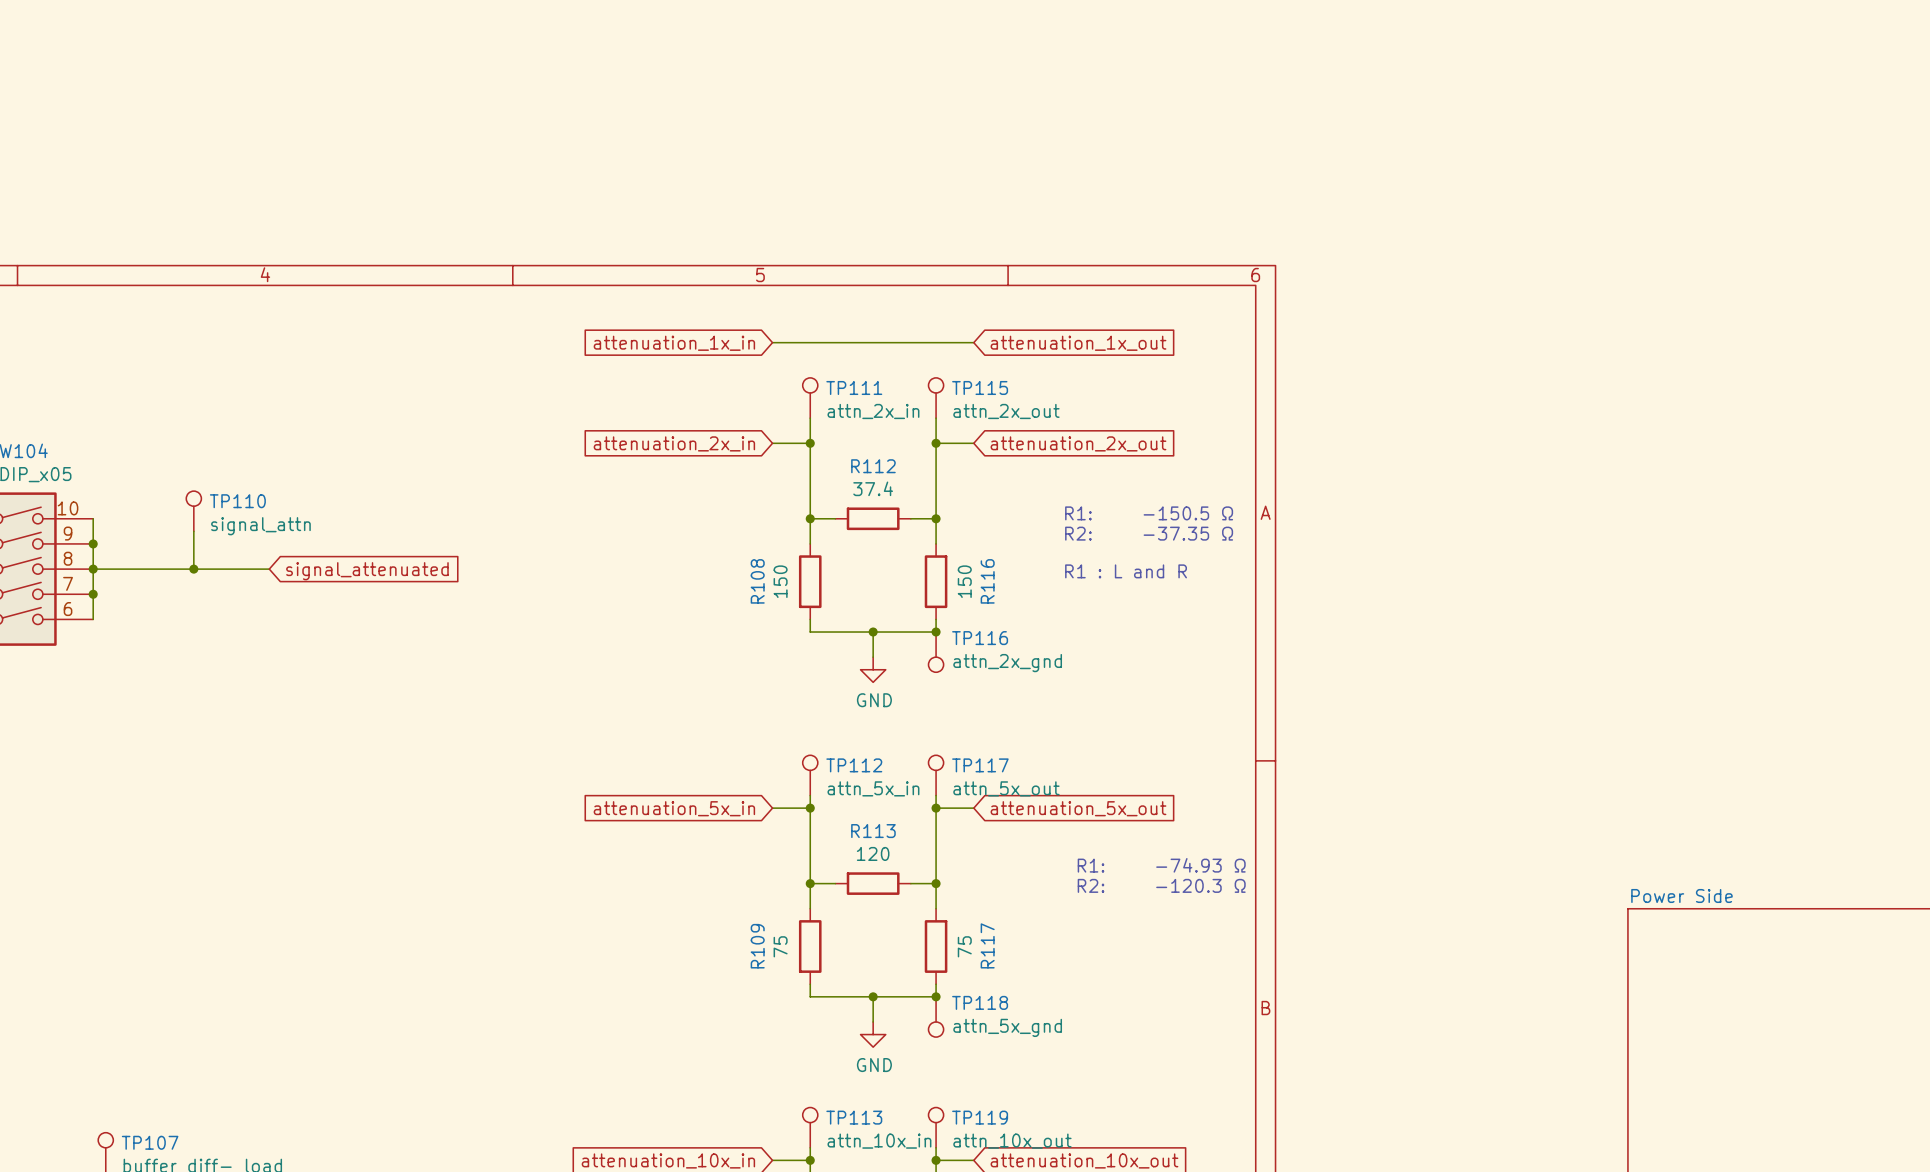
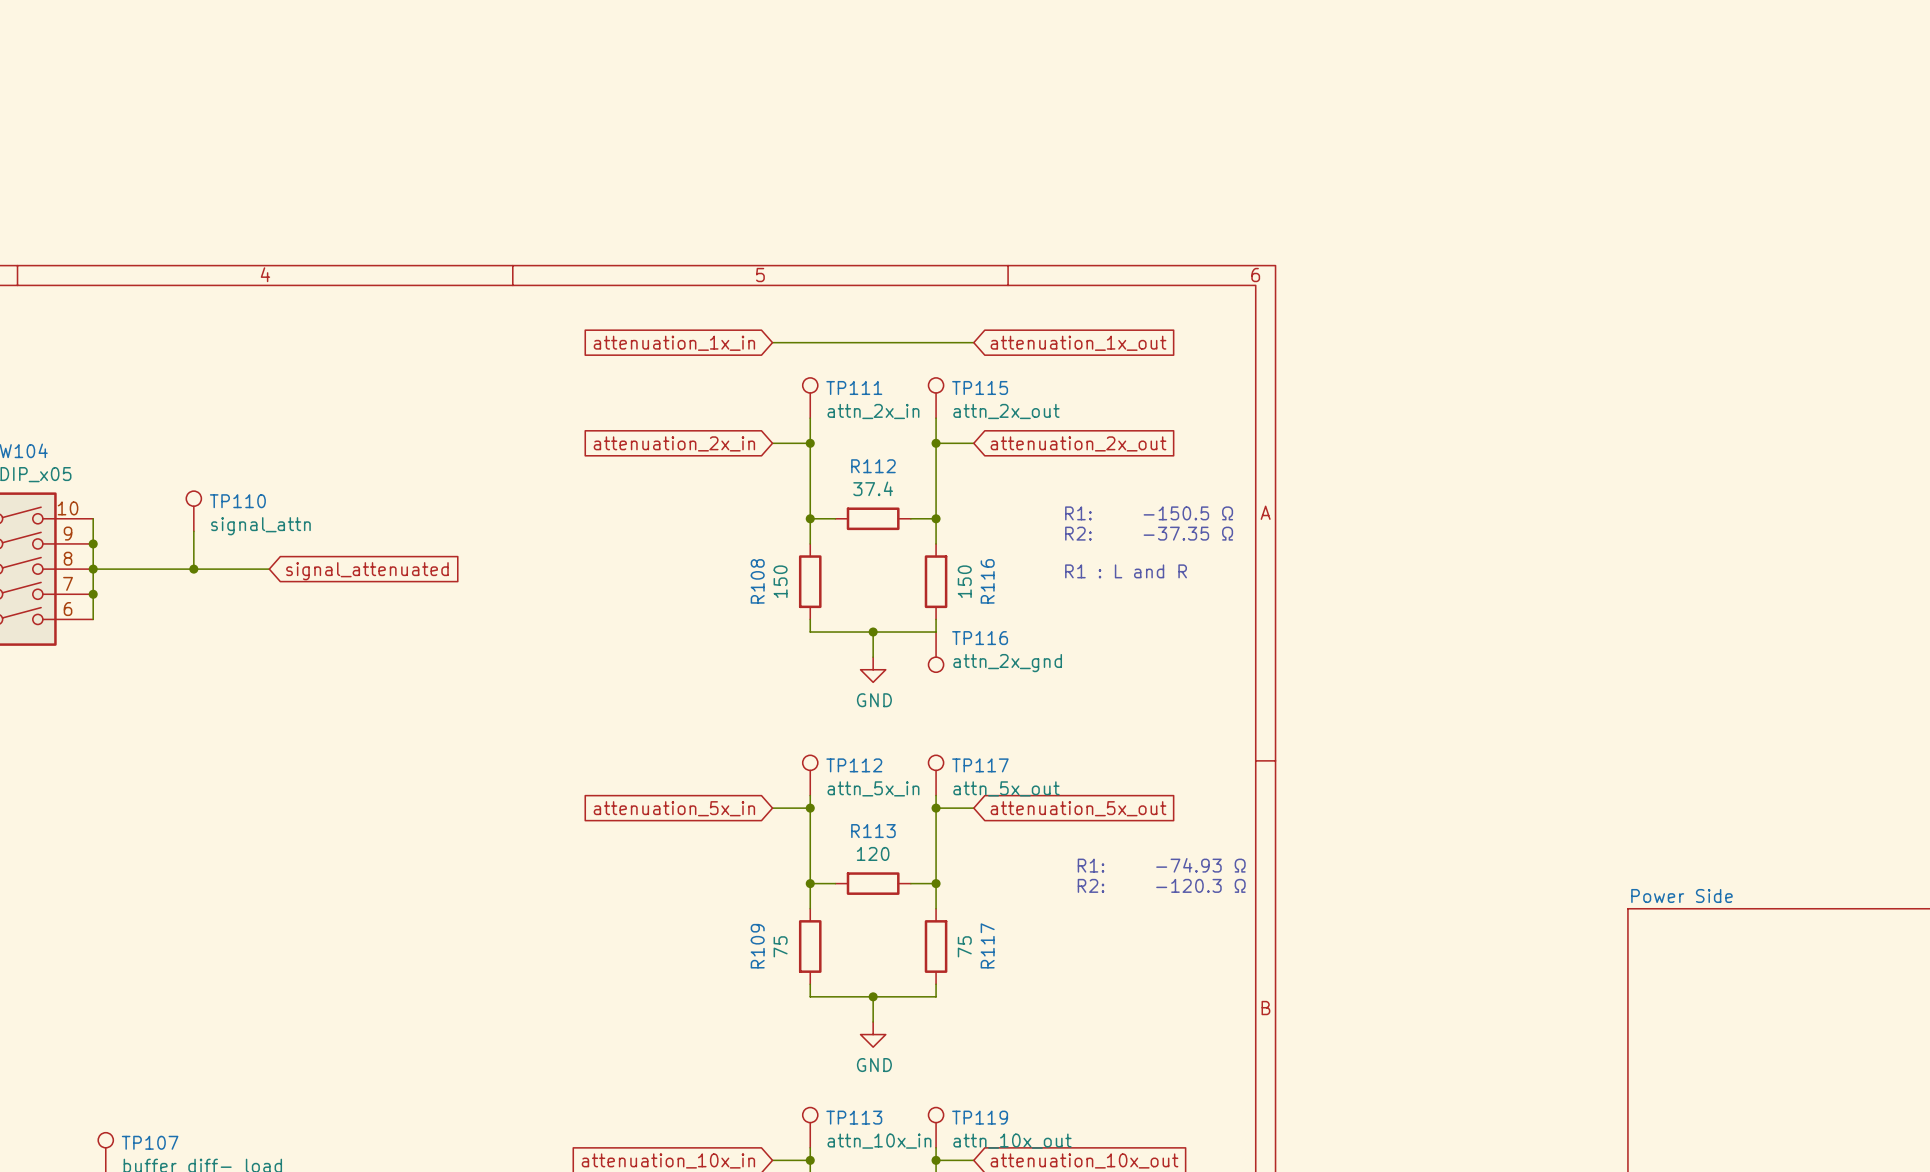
junction: (936, 632) -> none
junction: (936, 996) -> none
TP118: attn_5x_gnd (936, 1016) -> none

